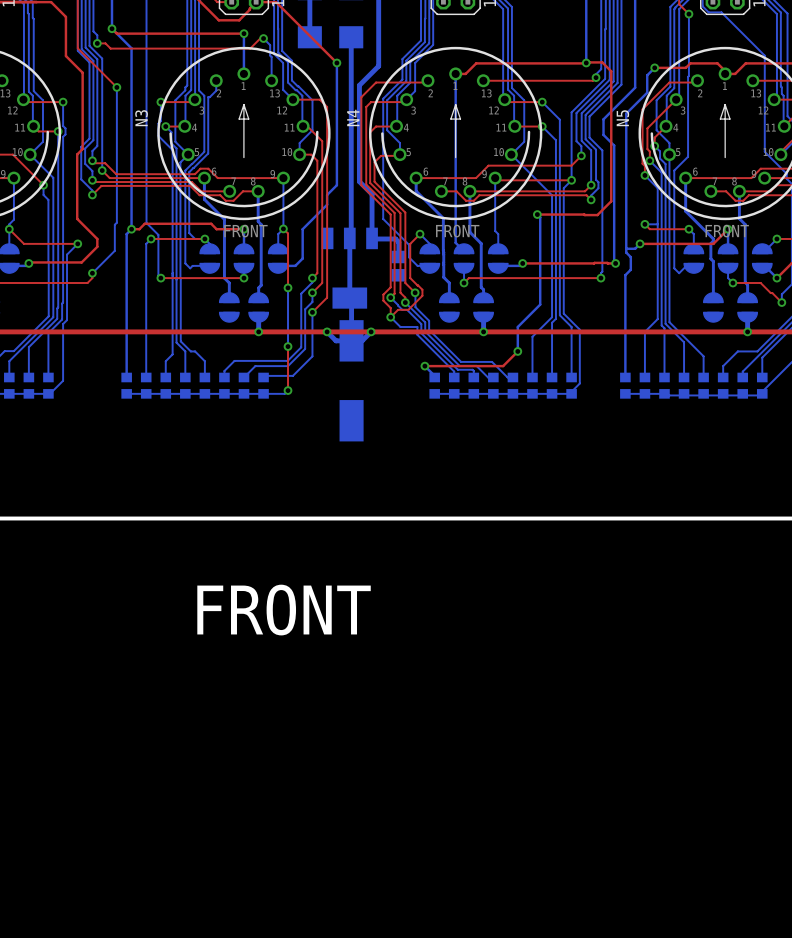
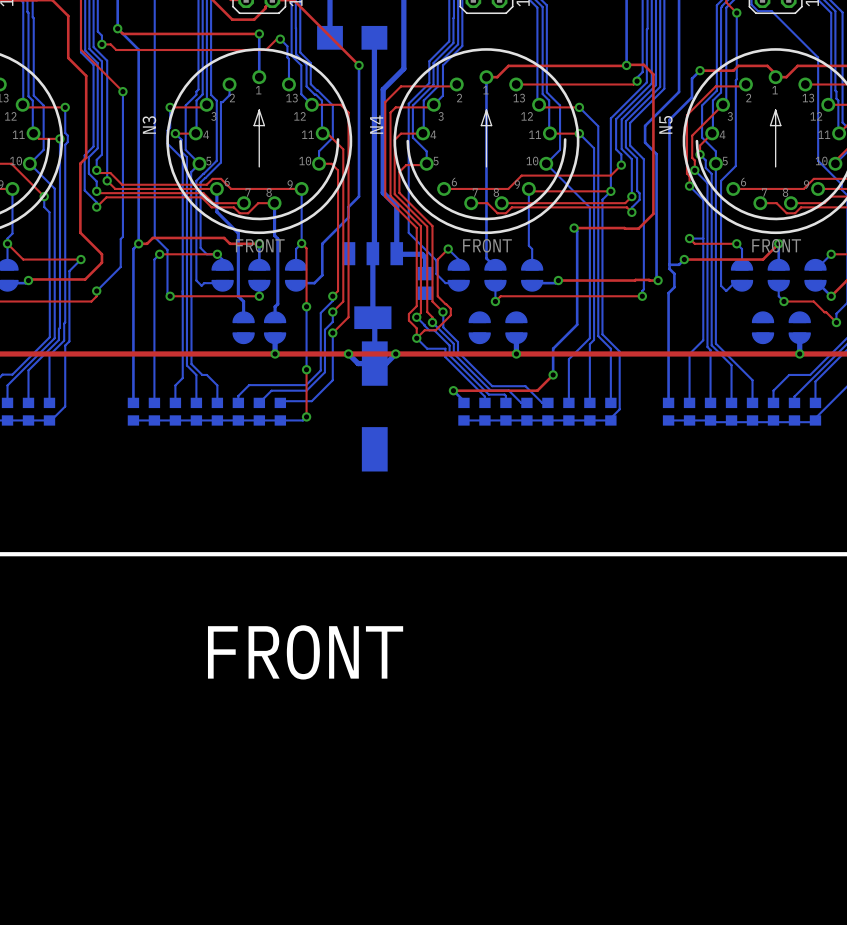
bottom track: (416, 178) (416, 191) (443, 218) (443, 277) (449, 283) (449, 300) -> none
bottom track: (685, 178) (685, 211) (713, 238) (710, 243) (710, 258) (713, 261) (713, 300) -> none
bottom track: (469, 191) (469, 232) (481, 243) (481, 287) (483, 289) (483, 300) -> none
bottom track: (739, 191) (739, 218) (745, 224) (745, 282) (747, 284) (747, 300) -> none

